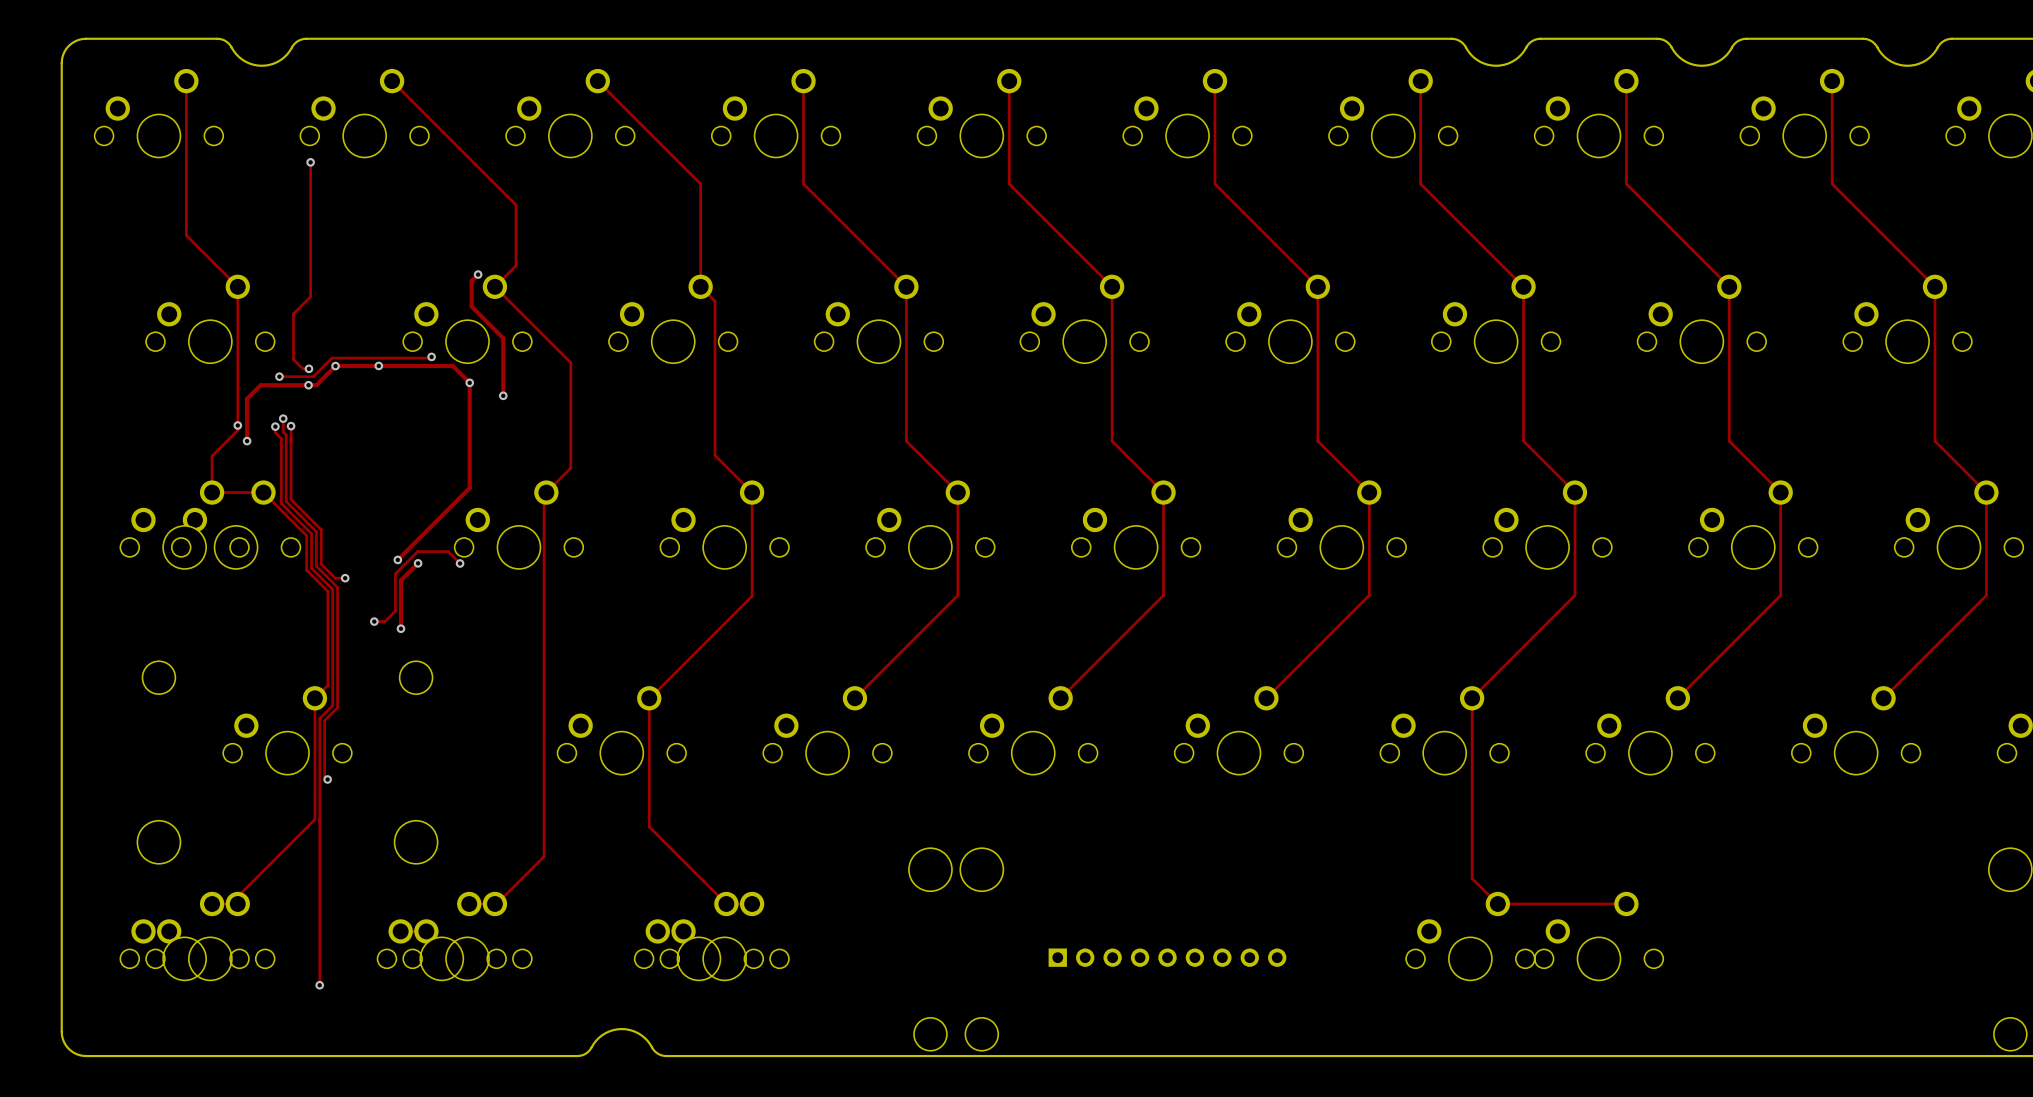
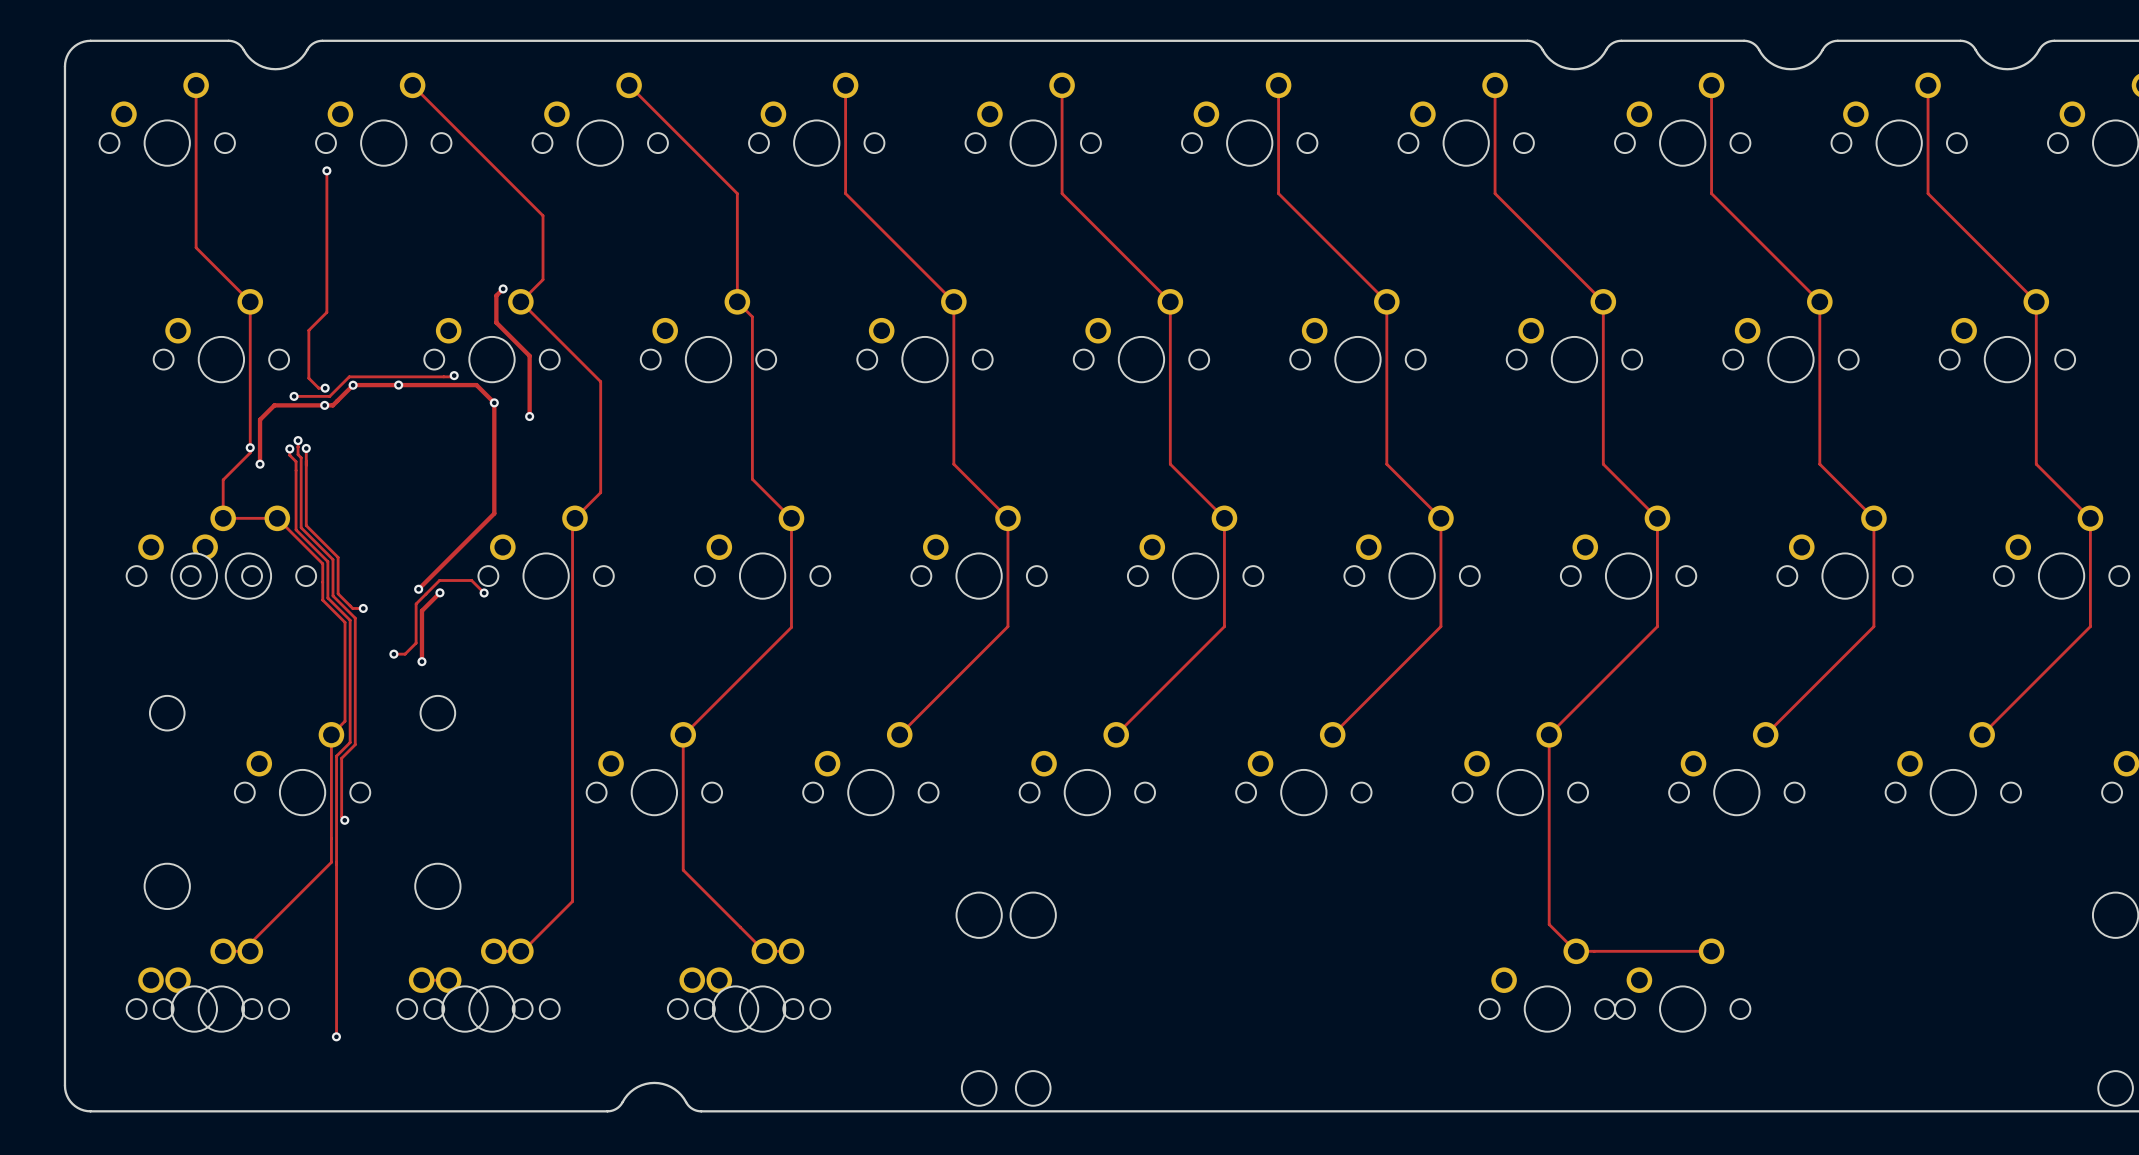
part: (1167, 957) -> none

